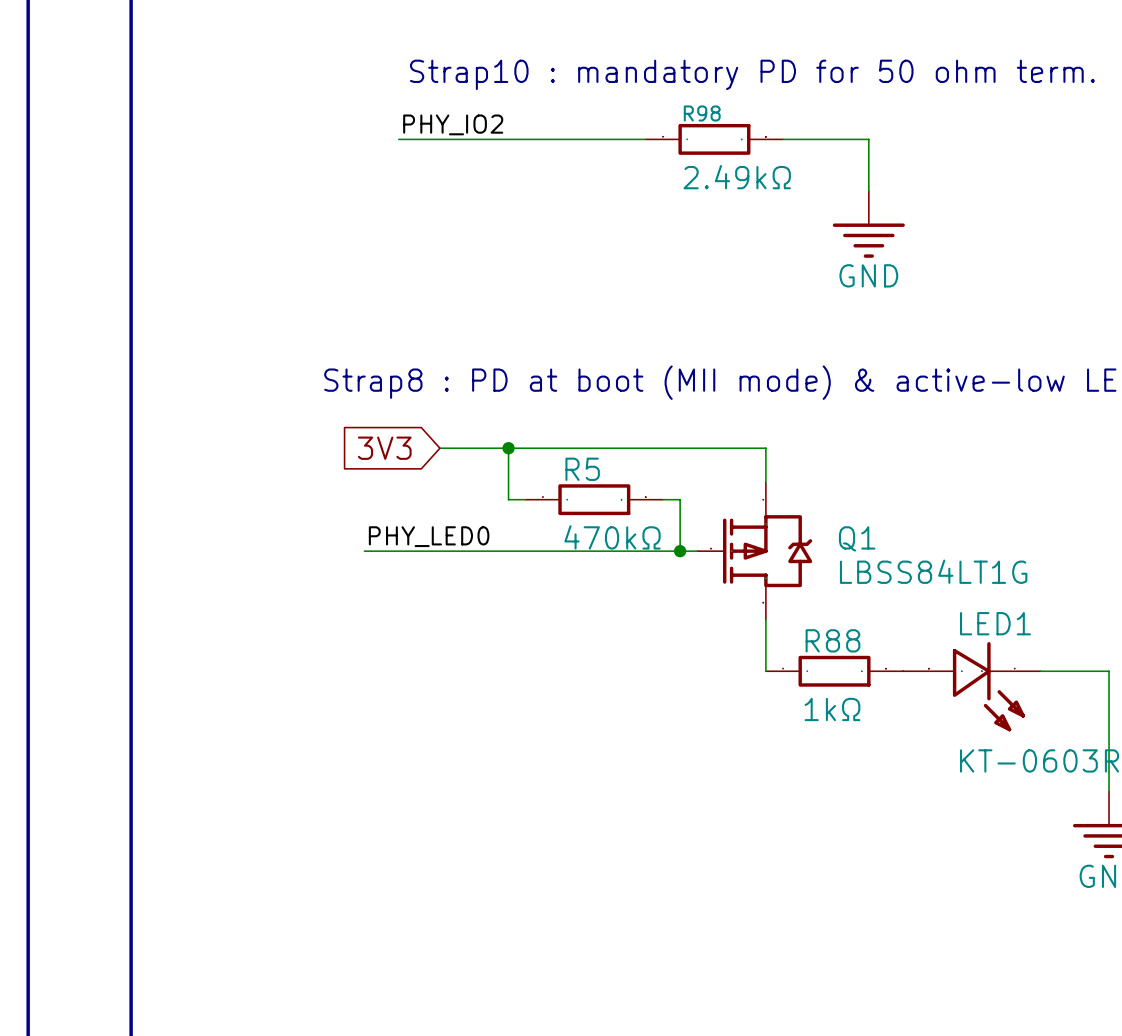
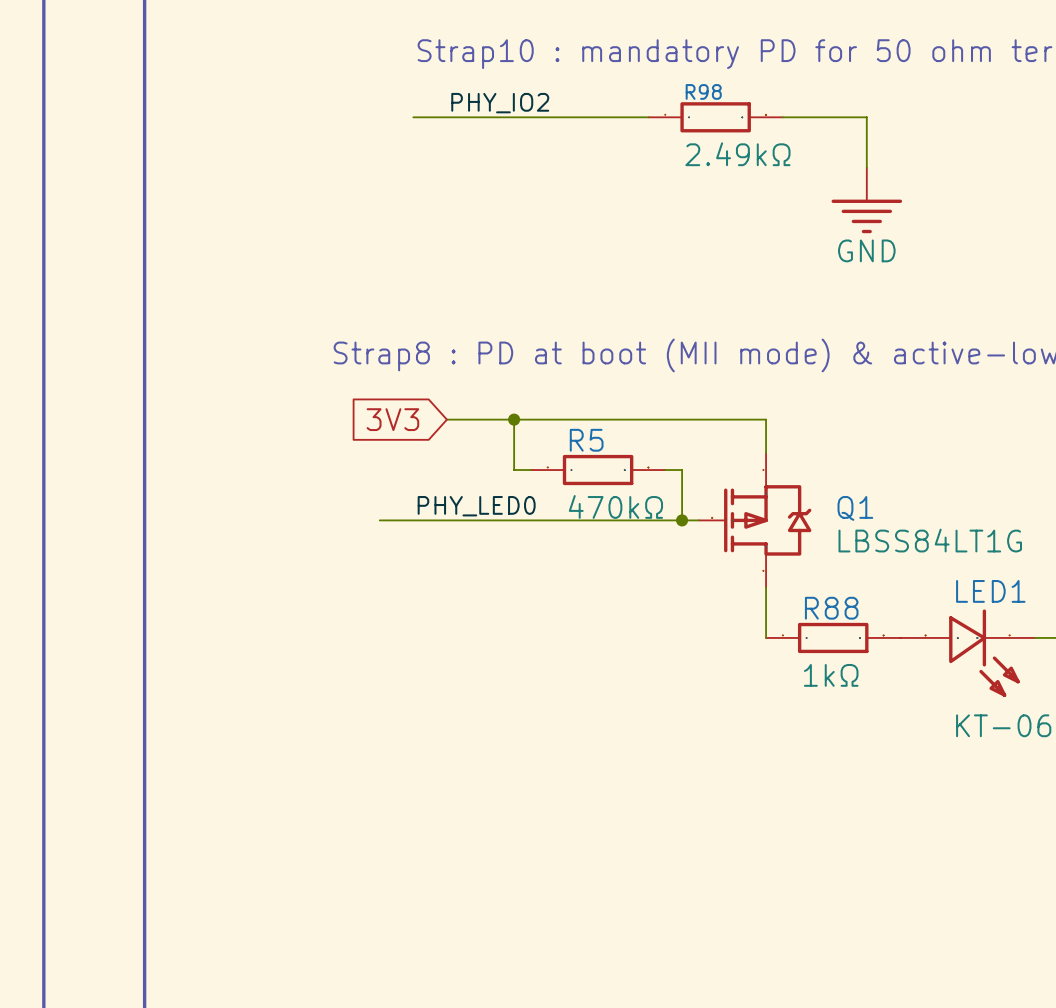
label position: PHY_IO2 (453, 124) -> PHY_IO2 (500, 103)
wire: (398, 139) (405, 139) -> none
label position: PHY_LED0 (429, 536) -> PHY_LED0 (476, 506)
wire: (364, 551) (371, 551) -> none

